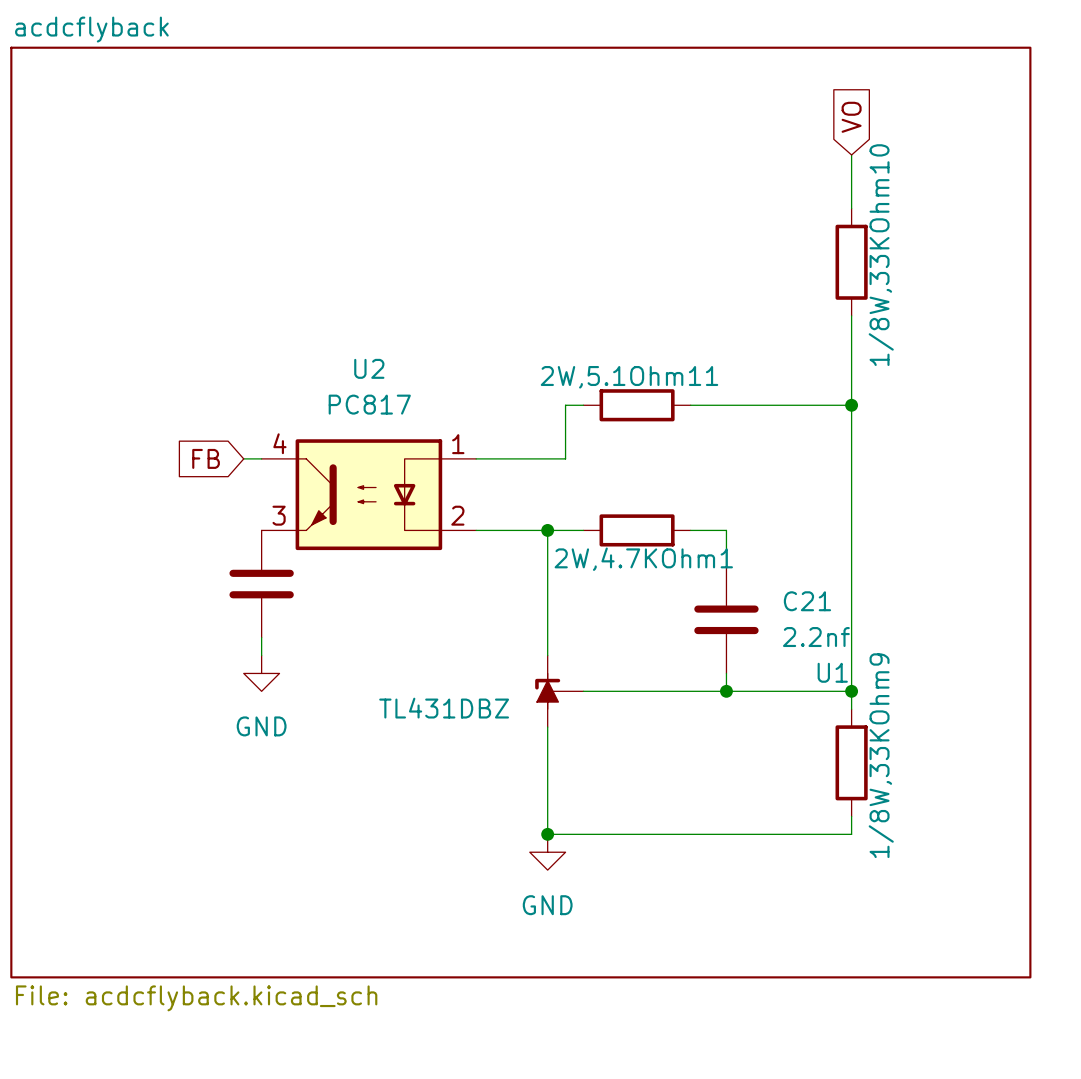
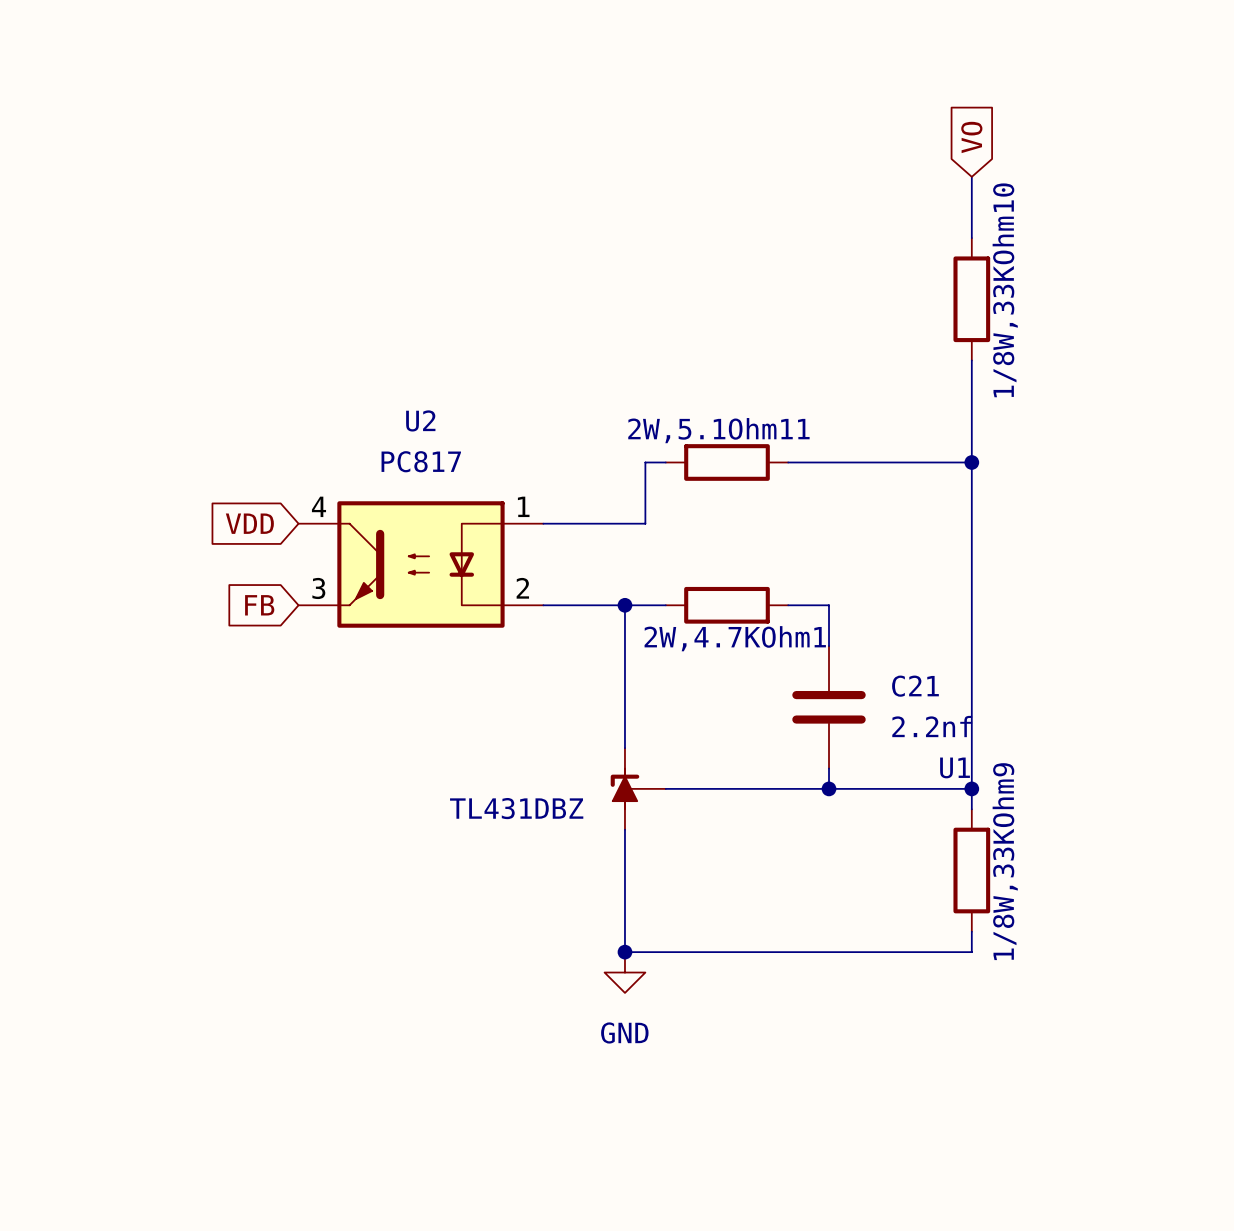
global label position: FB (206, 458) -> FB (259, 605)
global label: none -> VDD (249, 523)
wire: (243, 458) (261, 458) -> none
sheet acdcflyback: File: acdcflyback.kicad_sch (520, 512) -> none
part: (261, 584) -> none
wire: (261, 637) (261, 655) -> none
power symbol: GND (261, 673) -> none

